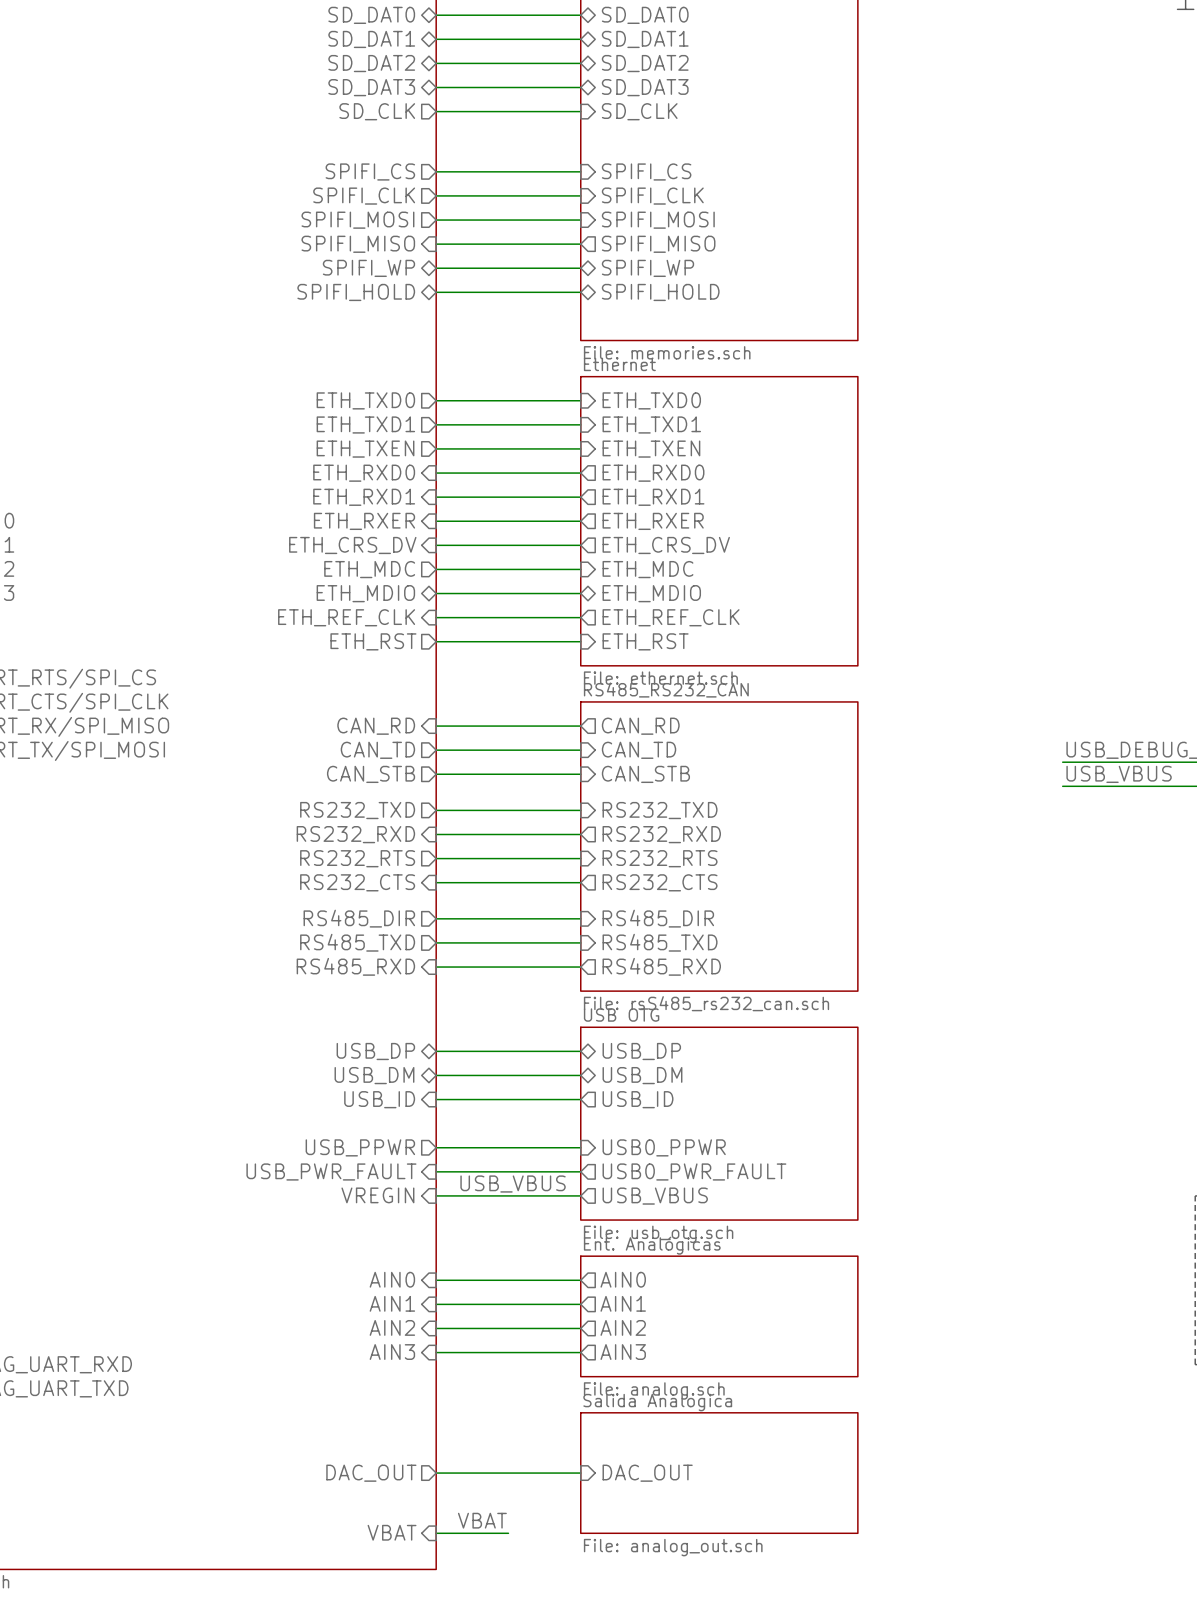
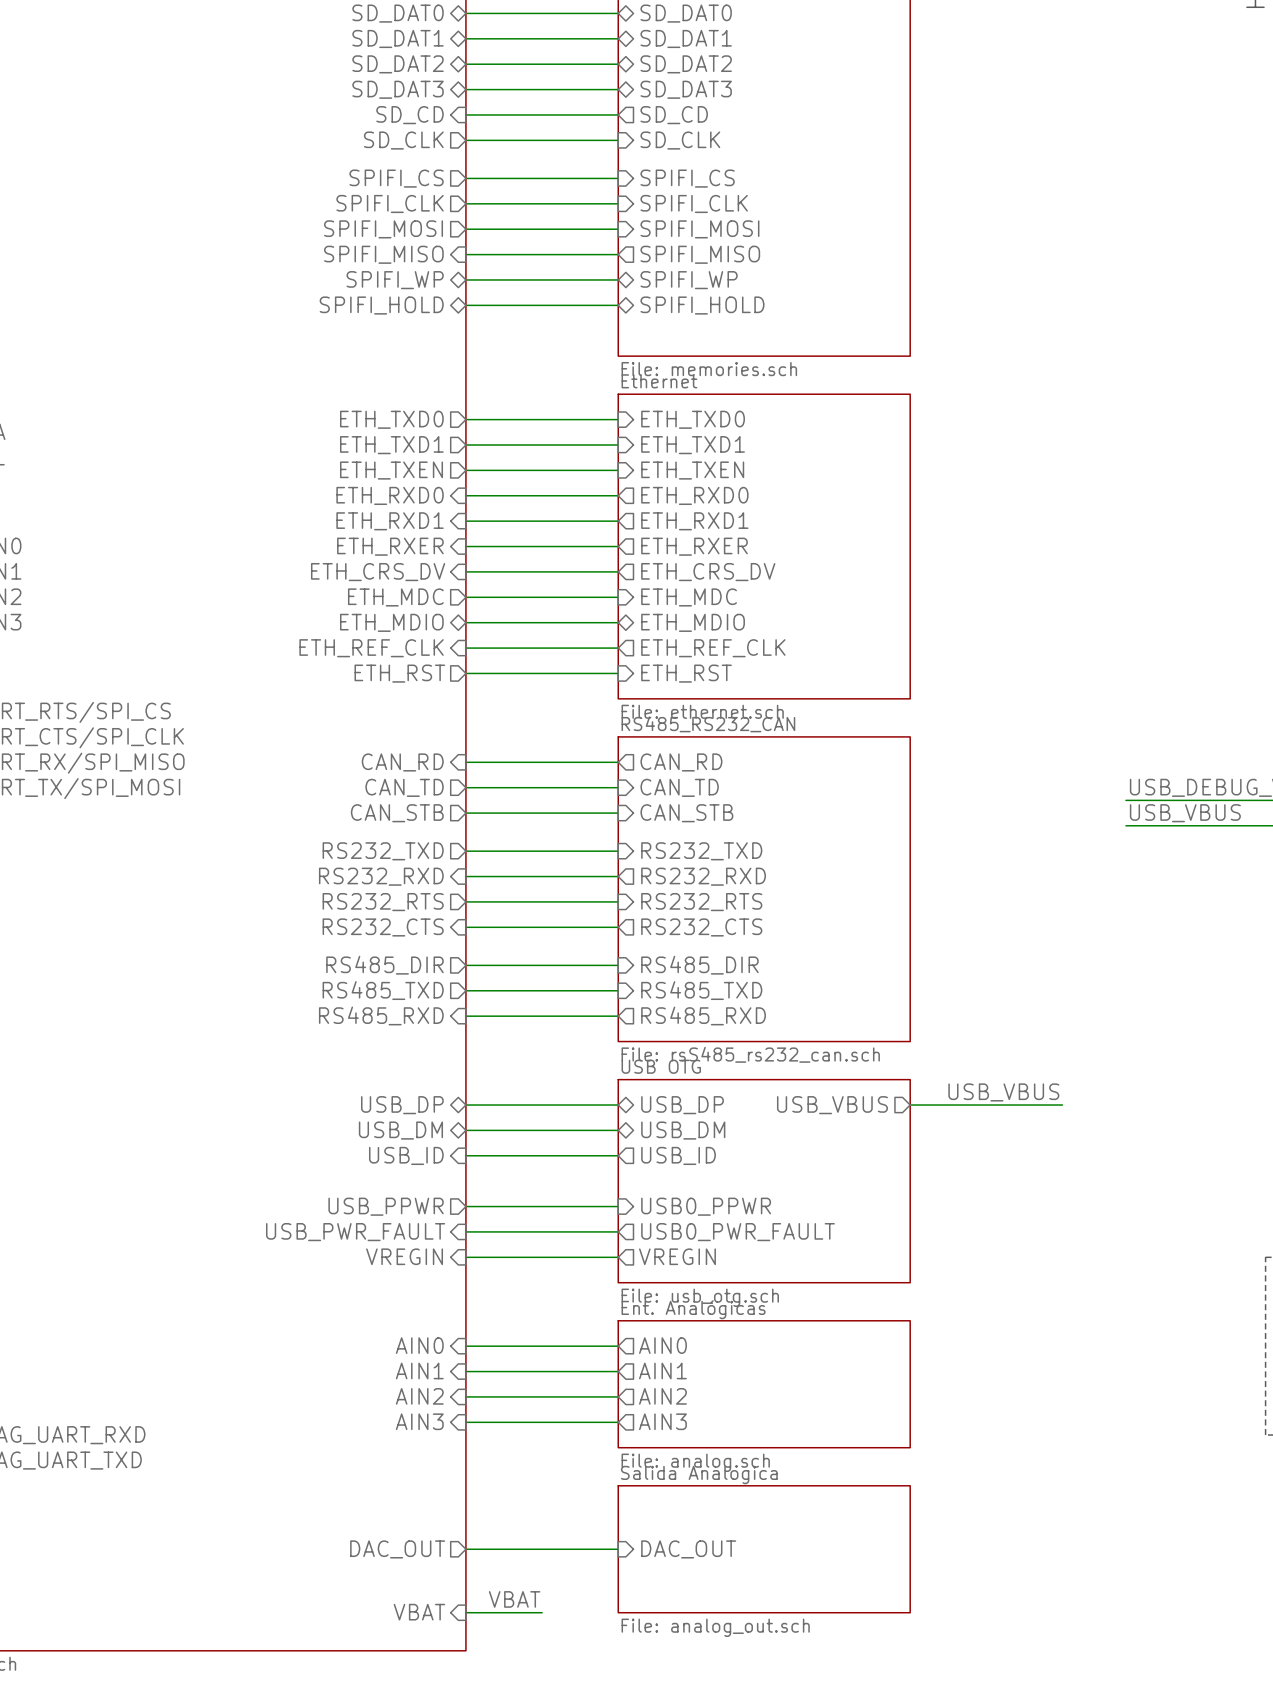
sheet pin shape: output (377, 111) -> input (409, 115)
sheet pin: SD_CLK (377, 111) -> SD_CD (409, 115)
sheet pin shape: input (639, 111) -> output (674, 115)
sheet pin: SD_CLK (639, 111) -> SD_CD (674, 115)
sheet pin: none -> SD_CLK (403, 140)
wire: none -> (465, 140) (618, 140)
sheet pin: none -> SD_CLK (680, 140)
label: none -> USB_VBUS (1003, 1092)
sheet pin: none -> USB_VBUS (832, 1105)
wire: none -> (910, 1105) (1062, 1105)
label: USB_VBUS (513, 1184) -> none
sheet pin: USB_VBUS (655, 1196) -> VREGIN (677, 1256)

